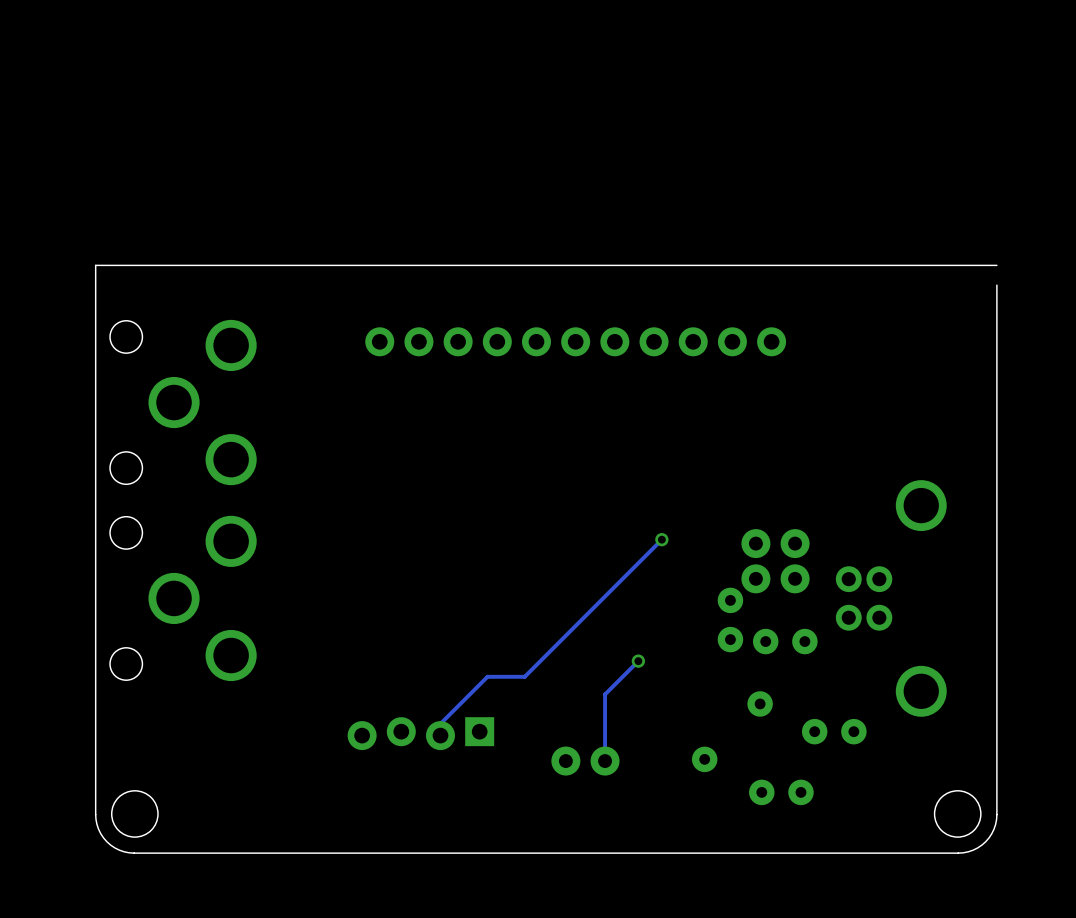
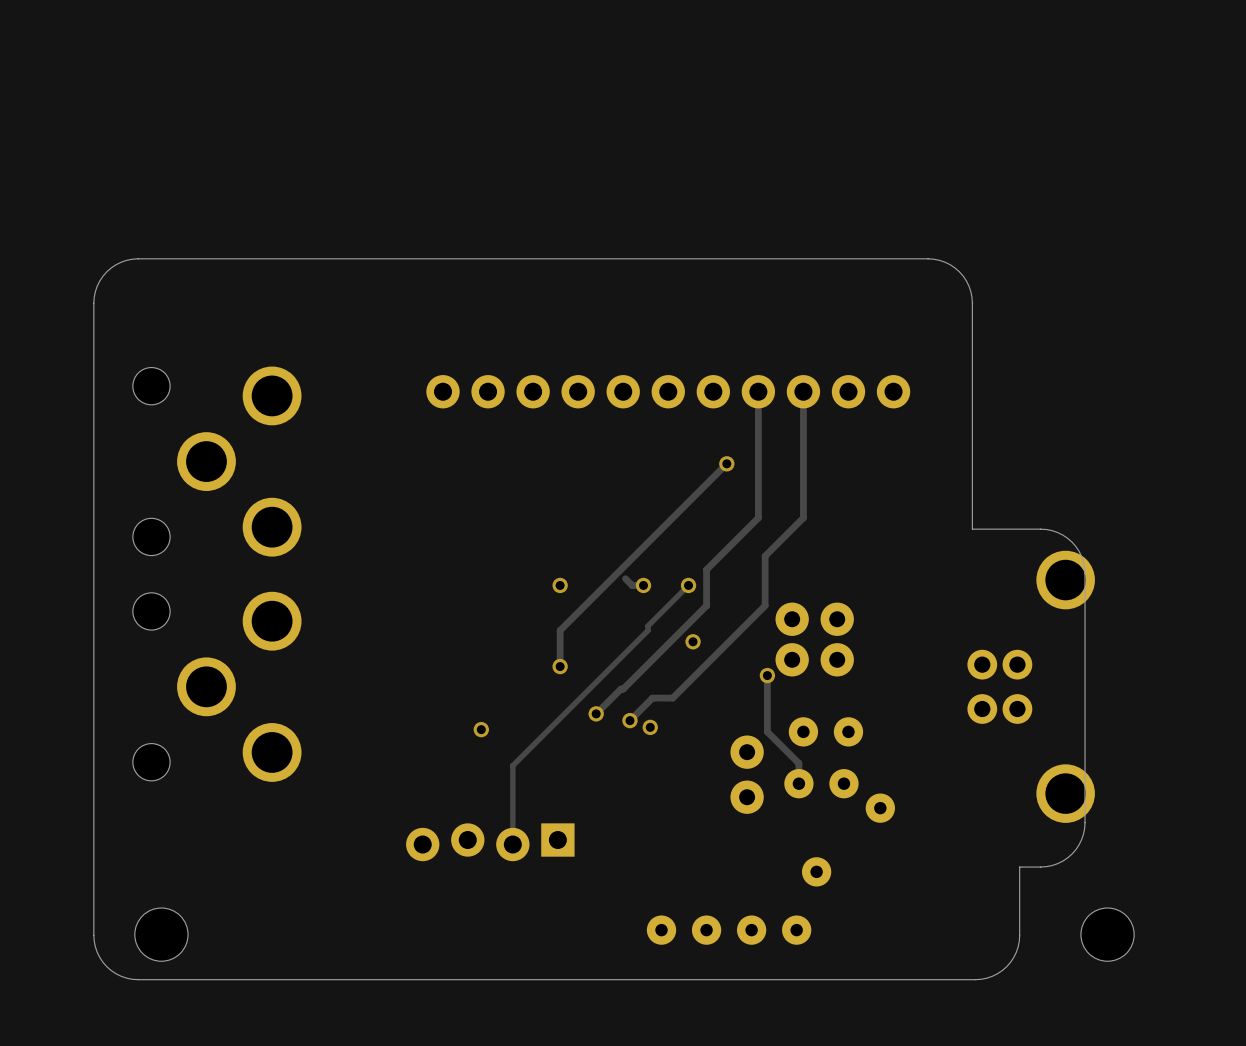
board edge: (996, 265) (95, 265) (96, 819) (100, 833) (106, 841) (119, 850) (134, 853) -> (975, 979) (986, 978) (997, 973) (1006, 966) (1016, 952) (1019, 935) (1019, 867) (1046, 866) (1062, 861) (1075, 849) (1083, 834) (1085, 573) (1083, 562) (1079, 551) (1072, 542) (1057, 532) (1040, 529) (972, 529) (972, 297) (966, 281) (955, 267) (945, 262) (928, 258) (138, 258) (121, 262) (106, 271) (97, 286) (93, 303) (93, 935) (95, 946) (99, 957) (106, 966) (116, 973) (132, 979) (160, 979)
board edge: (996, 285) (995, 824) (985, 841) (977, 847) (963, 852) (842, 853) -> none
track: none -> (758, 391) (758, 517) (706, 569) (706, 605) (596, 713)
track: none -> (803, 391) (803, 517) (765, 556) (765, 605) (672, 698) (652, 698) (629, 720)
track: none -> (726, 463) (560, 630) (560, 666)
via: none -> (726, 463)
track: none -> (625, 578) (632, 585) (643, 585)
via: none -> (560, 585)
via: none -> (643, 585)
via: none -> (688, 585)
track: (661, 539) (524, 676) (487, 676) (440, 723) -> (688, 585) (648, 626) (648, 630) (512, 765) (512, 831)
via: (661, 539) -> none
part: none -> (814, 619)
part: (775, 543) -> none
via: none -> (693, 641)
part: none -> (814, 659)
part: (775, 578) -> none
via: none -> (560, 666)
track: none -> (767, 675) (767, 731) (798, 763) (798, 783)
via: none -> (767, 675)
part rotation: 0° (730, 619) -> 90° clockwise (825, 731)
via: none -> (596, 713)
via: none -> (629, 720)
via: none -> (650, 727)
via: none -> (481, 729)
part: (785, 641) -> none
track: (638, 661) (605, 694) (605, 761) -> none
via: (638, 661) -> none
part: none -> (747, 774)
part: none -> (821, 783)
part: (834, 731) -> none
part: (585, 761) -> none
part: (781, 792) -> none
part: none -> (684, 930)
part: none -> (774, 930)

